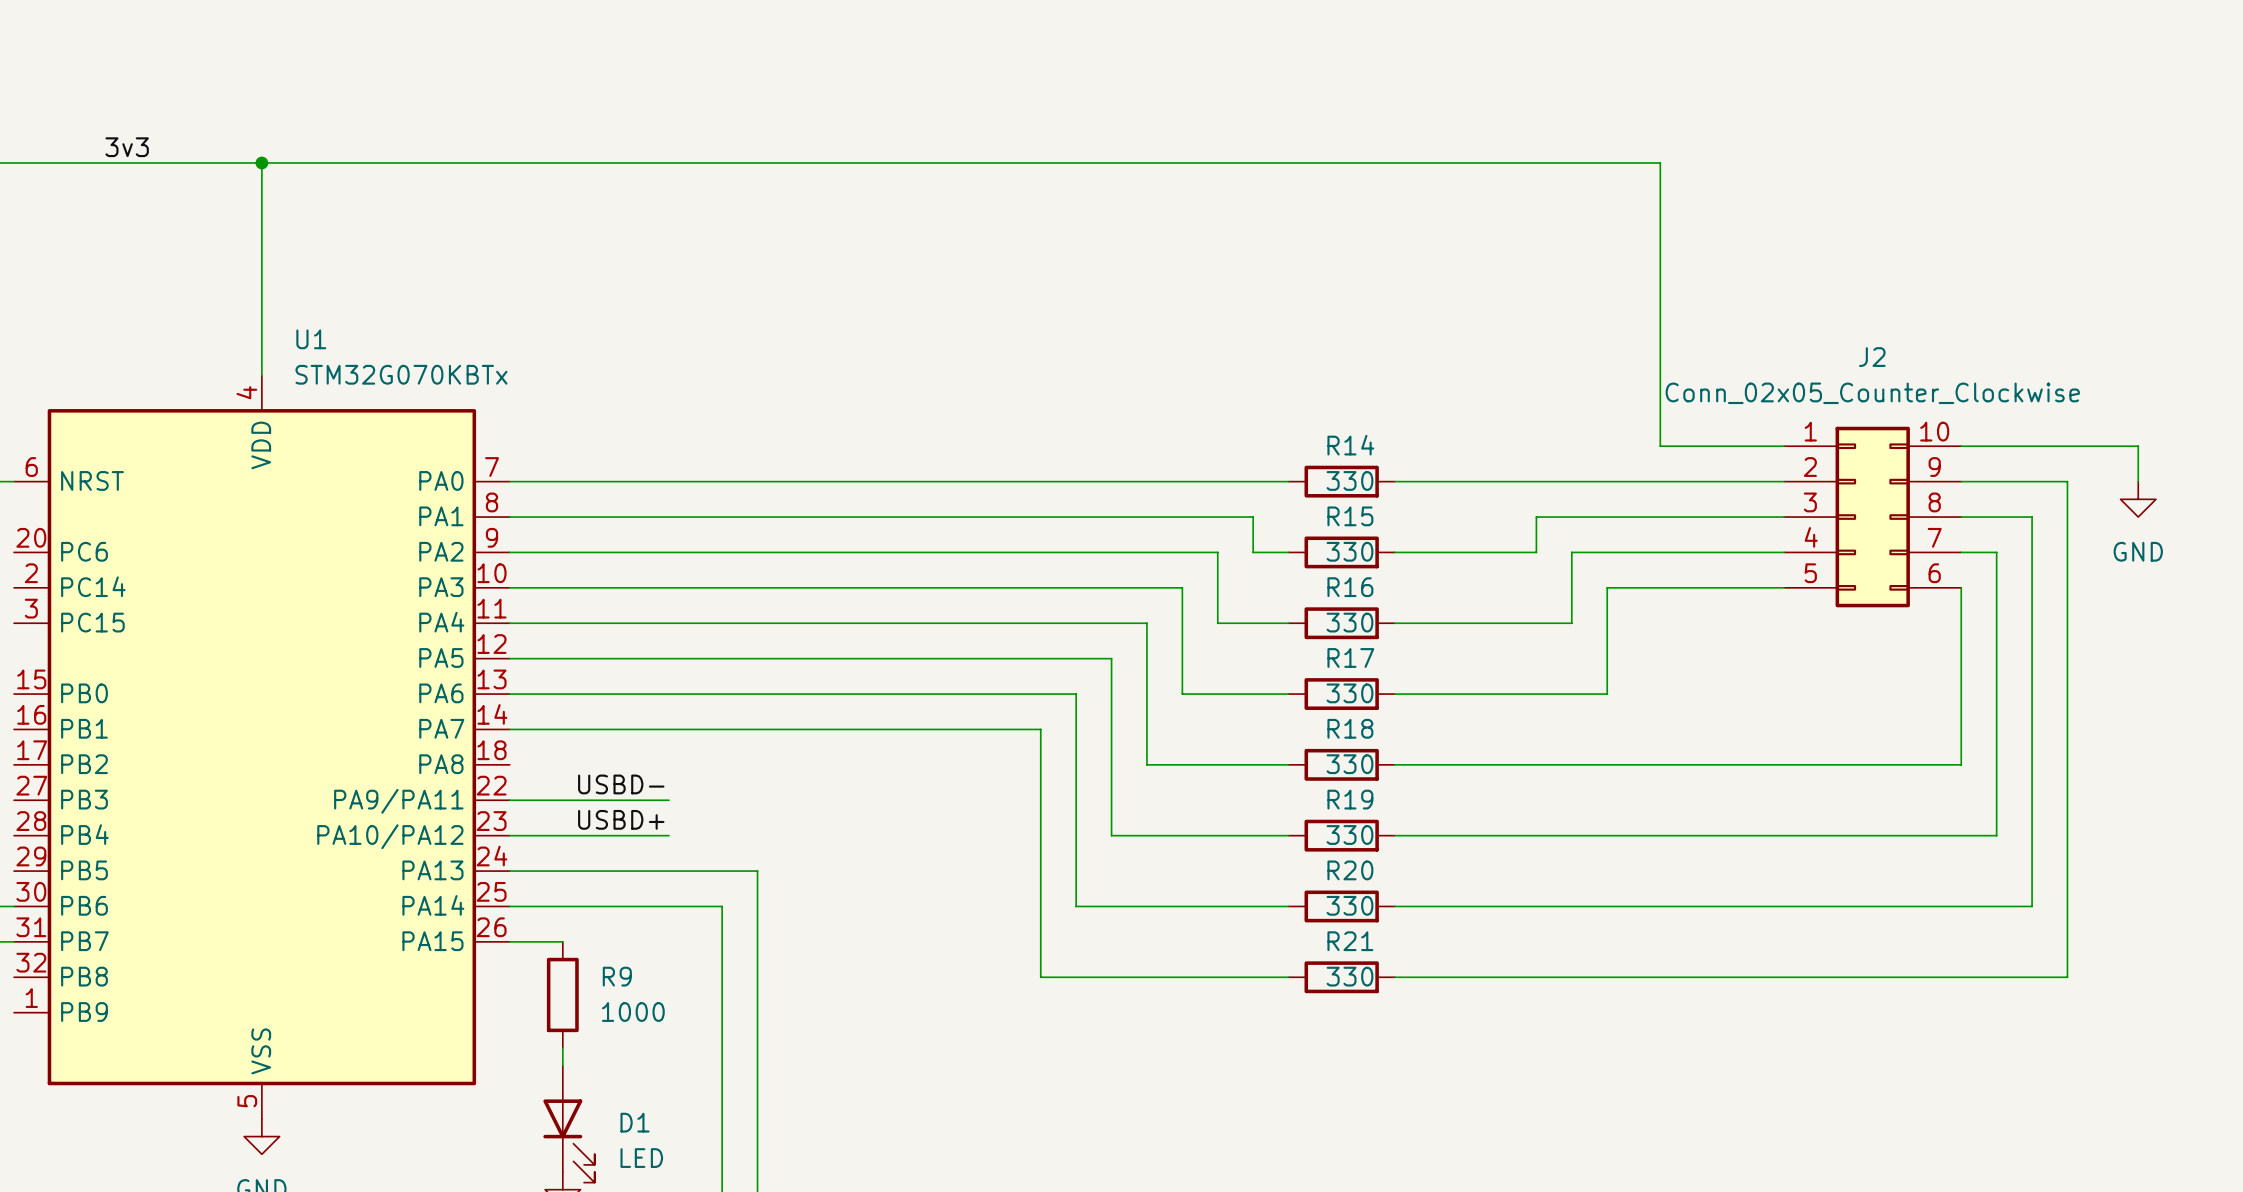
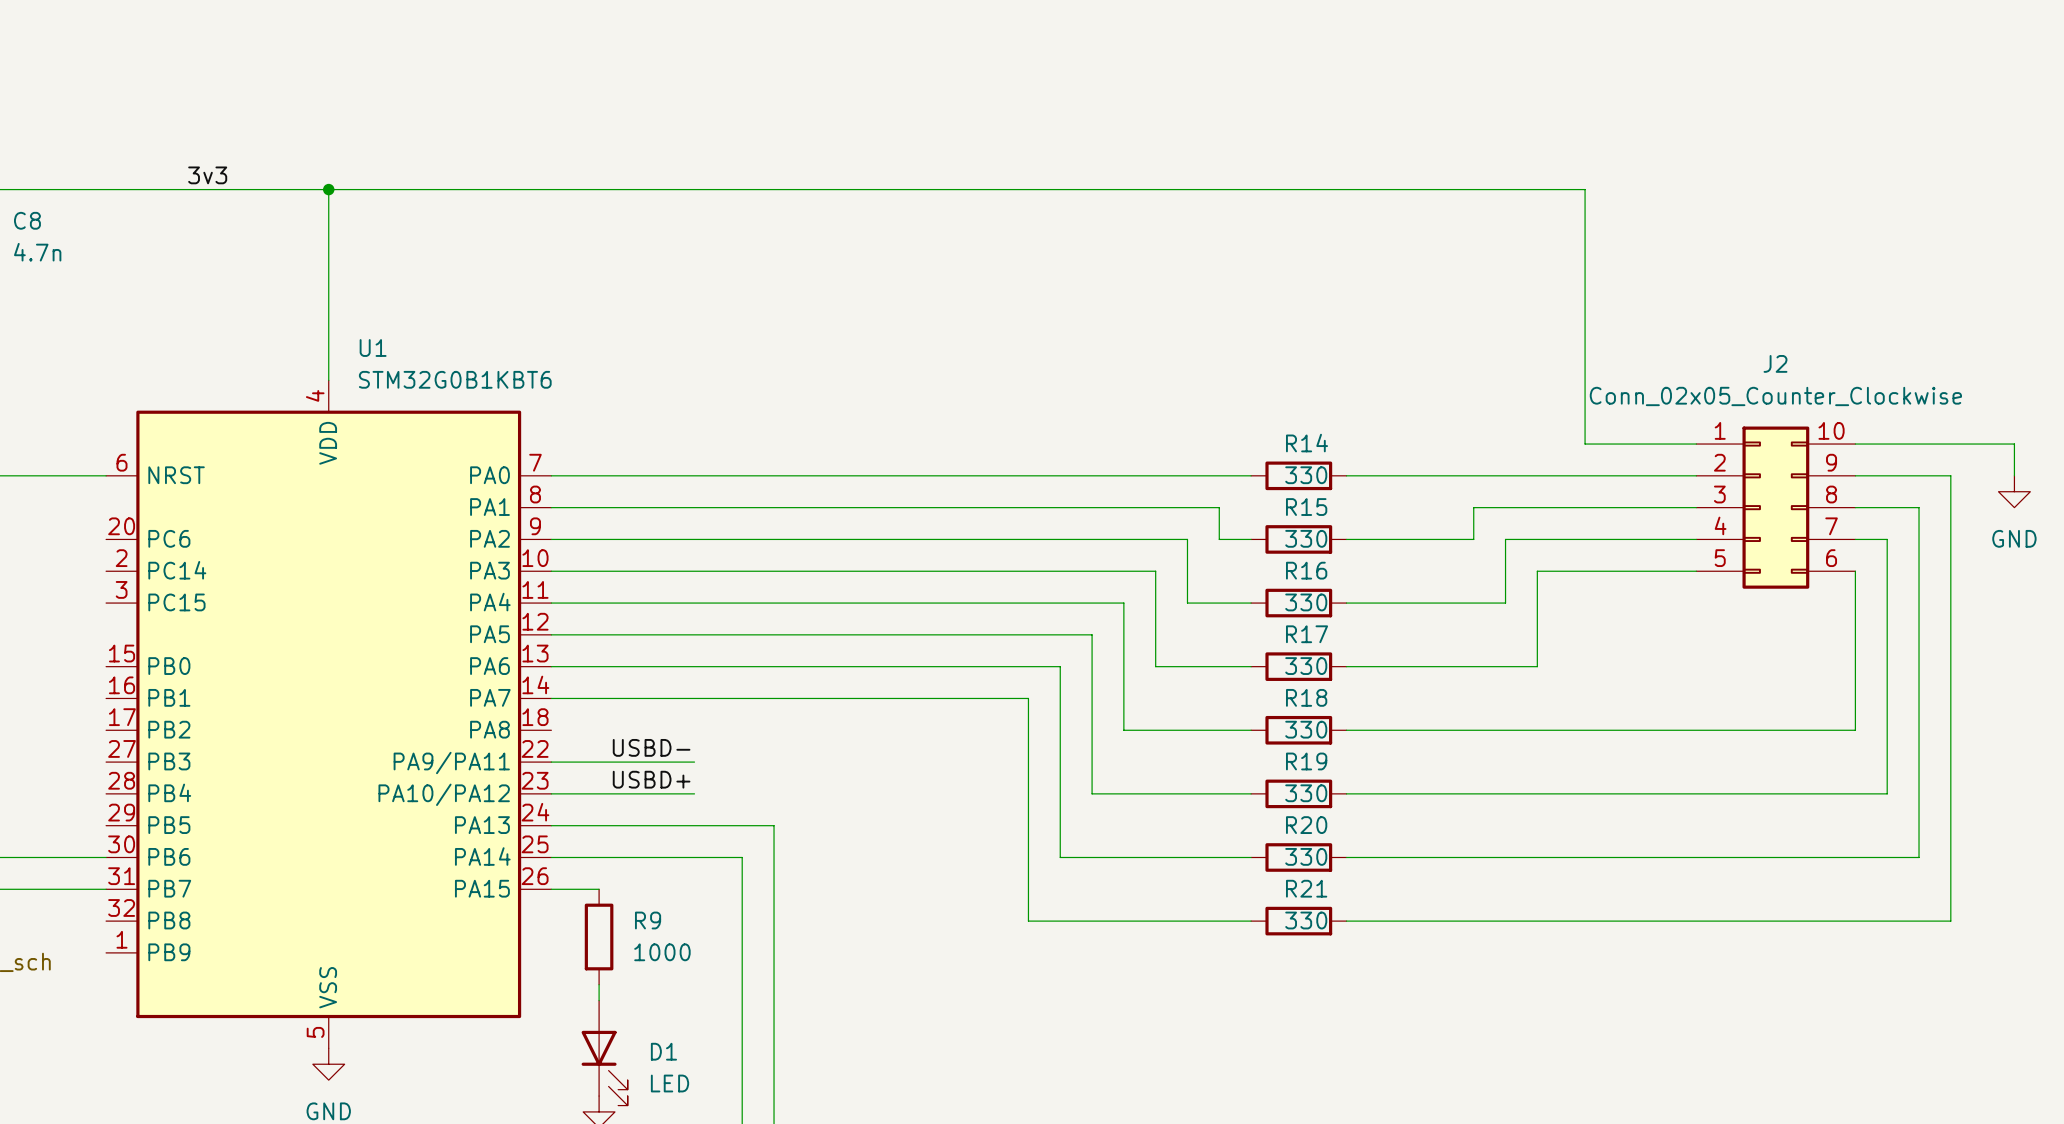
U1 value: STM32G070KBTx (401, 374) -> STM32G0B1KBT6 (455, 379)

